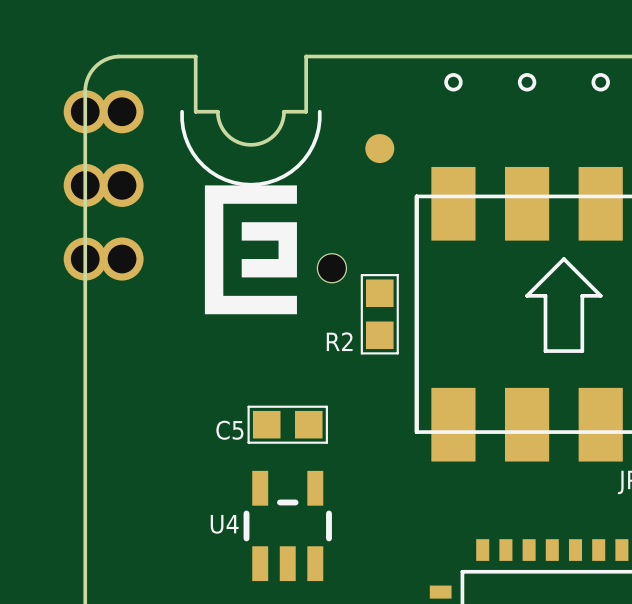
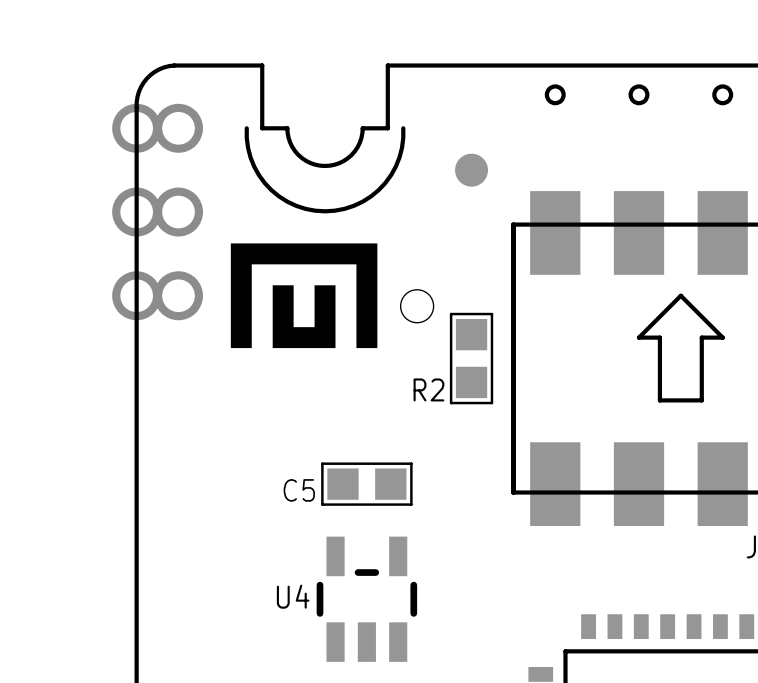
drawing shape: [204, 185, 297, 315] -> [230, 243, 378, 349]

